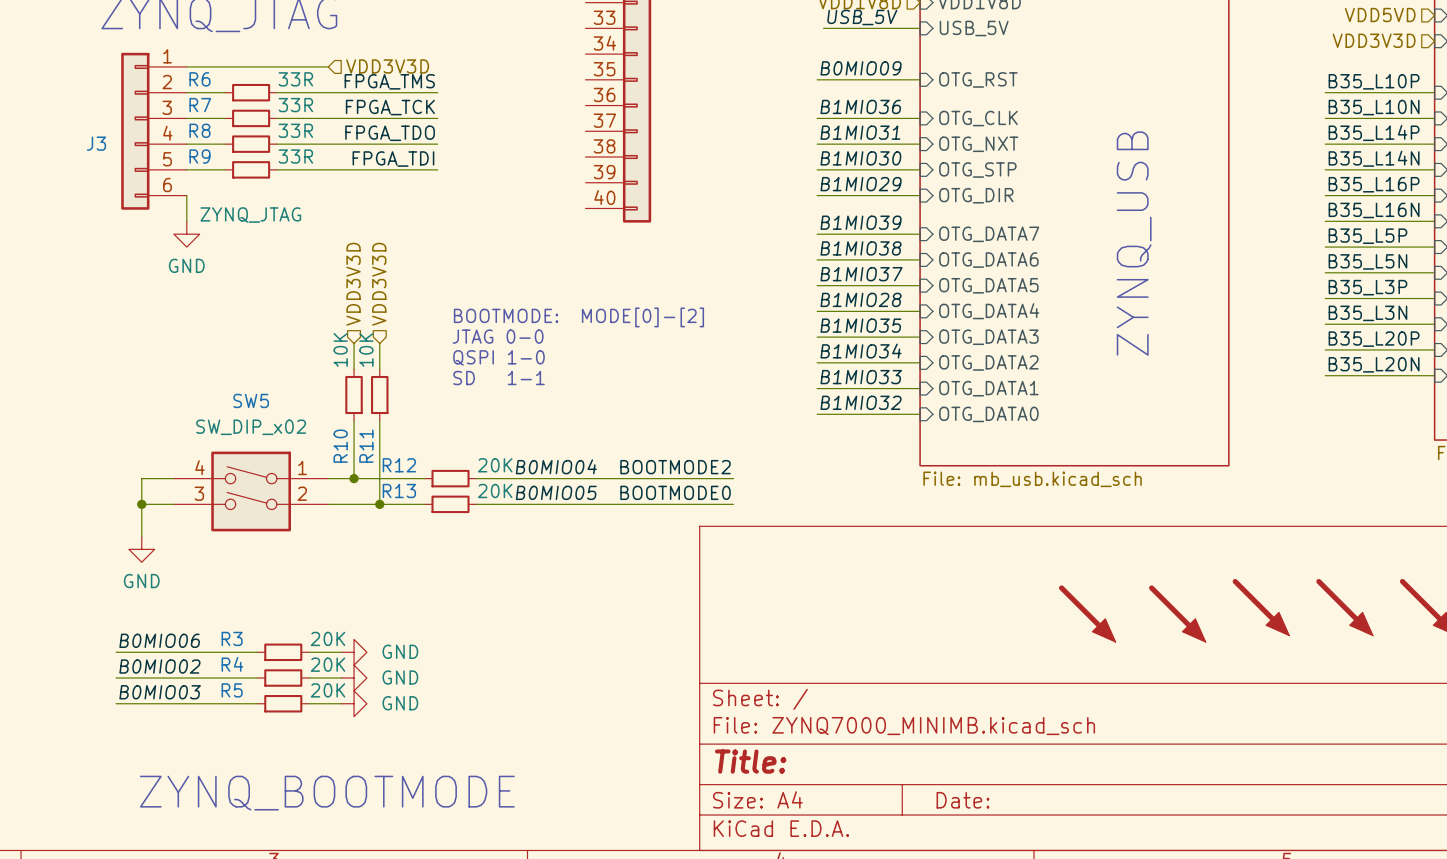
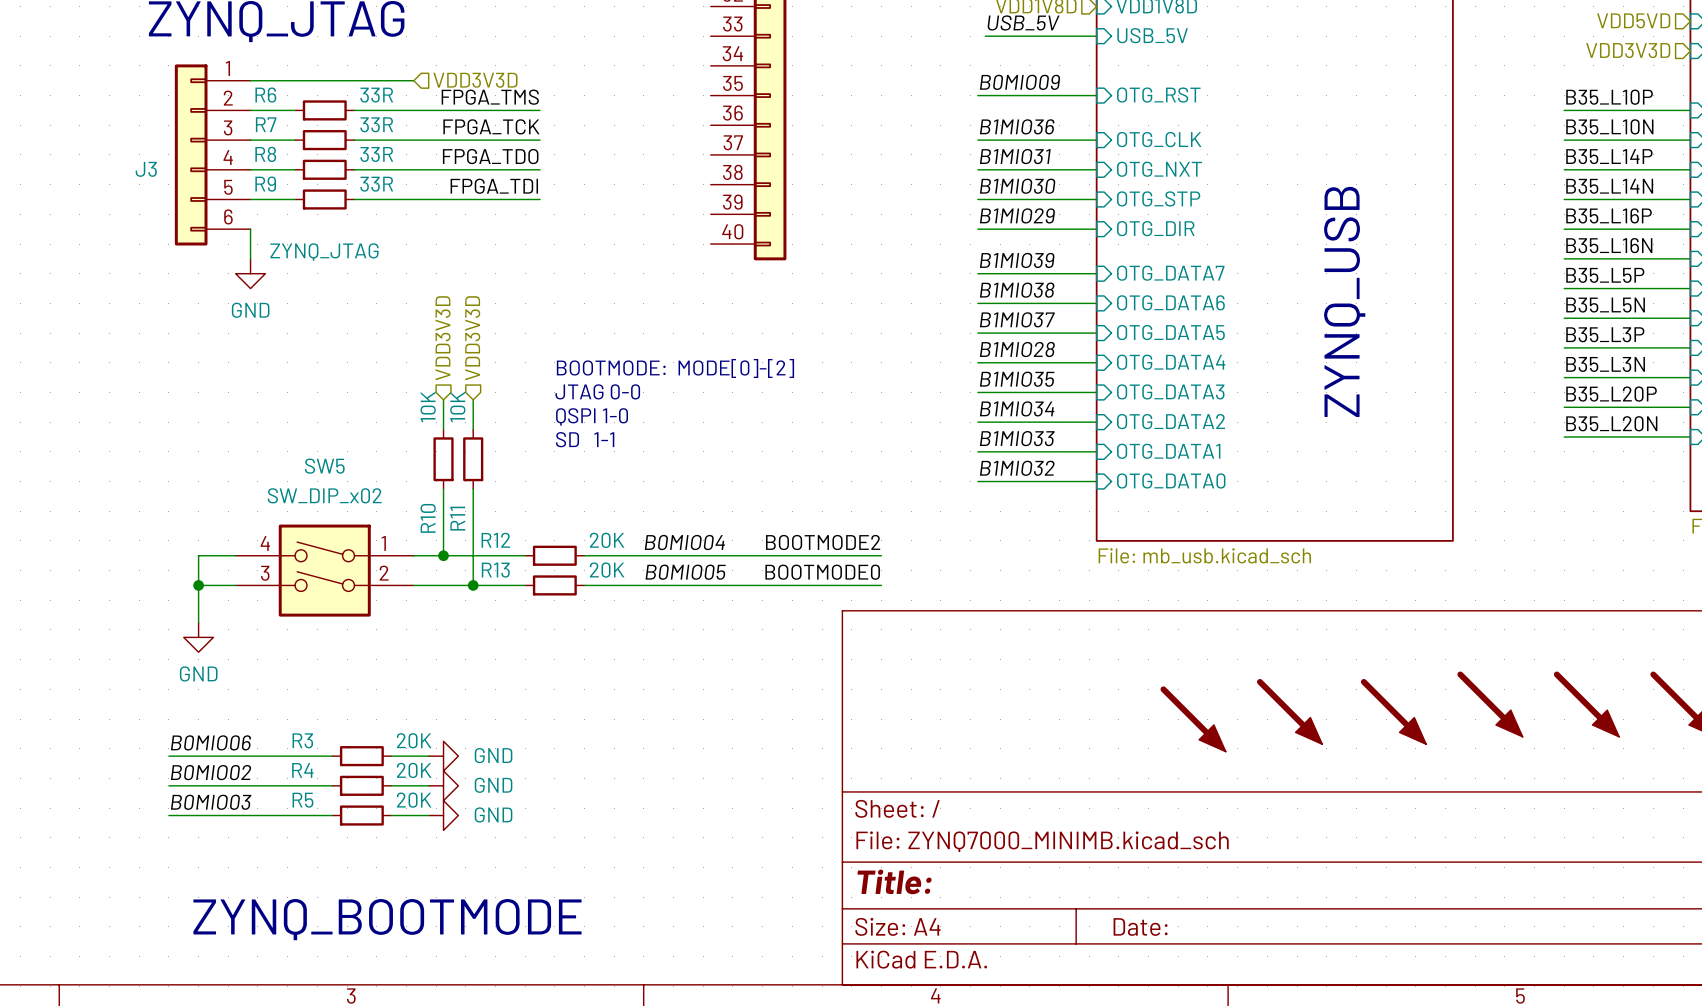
part: none -> (1193, 719)

